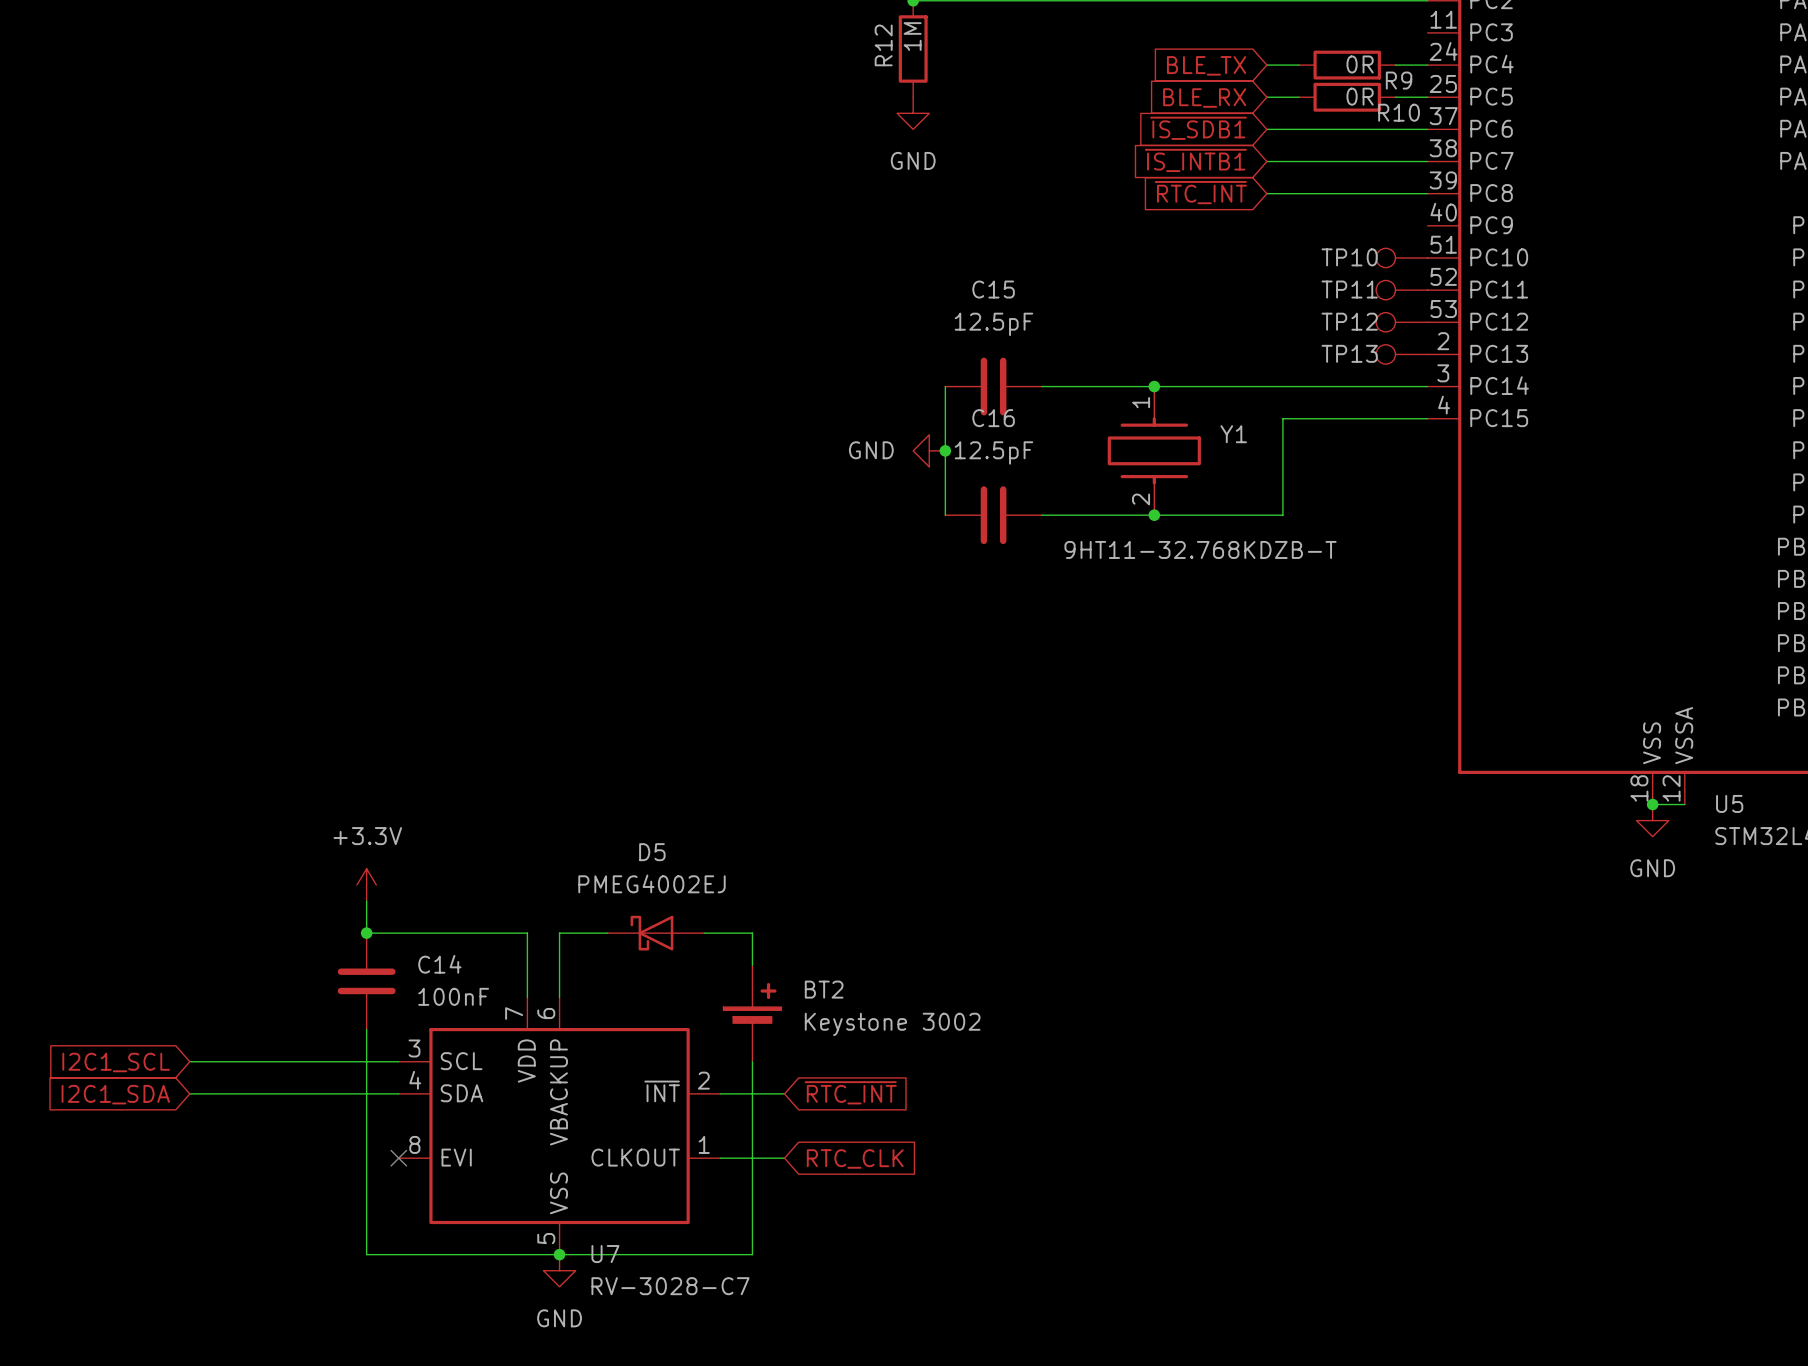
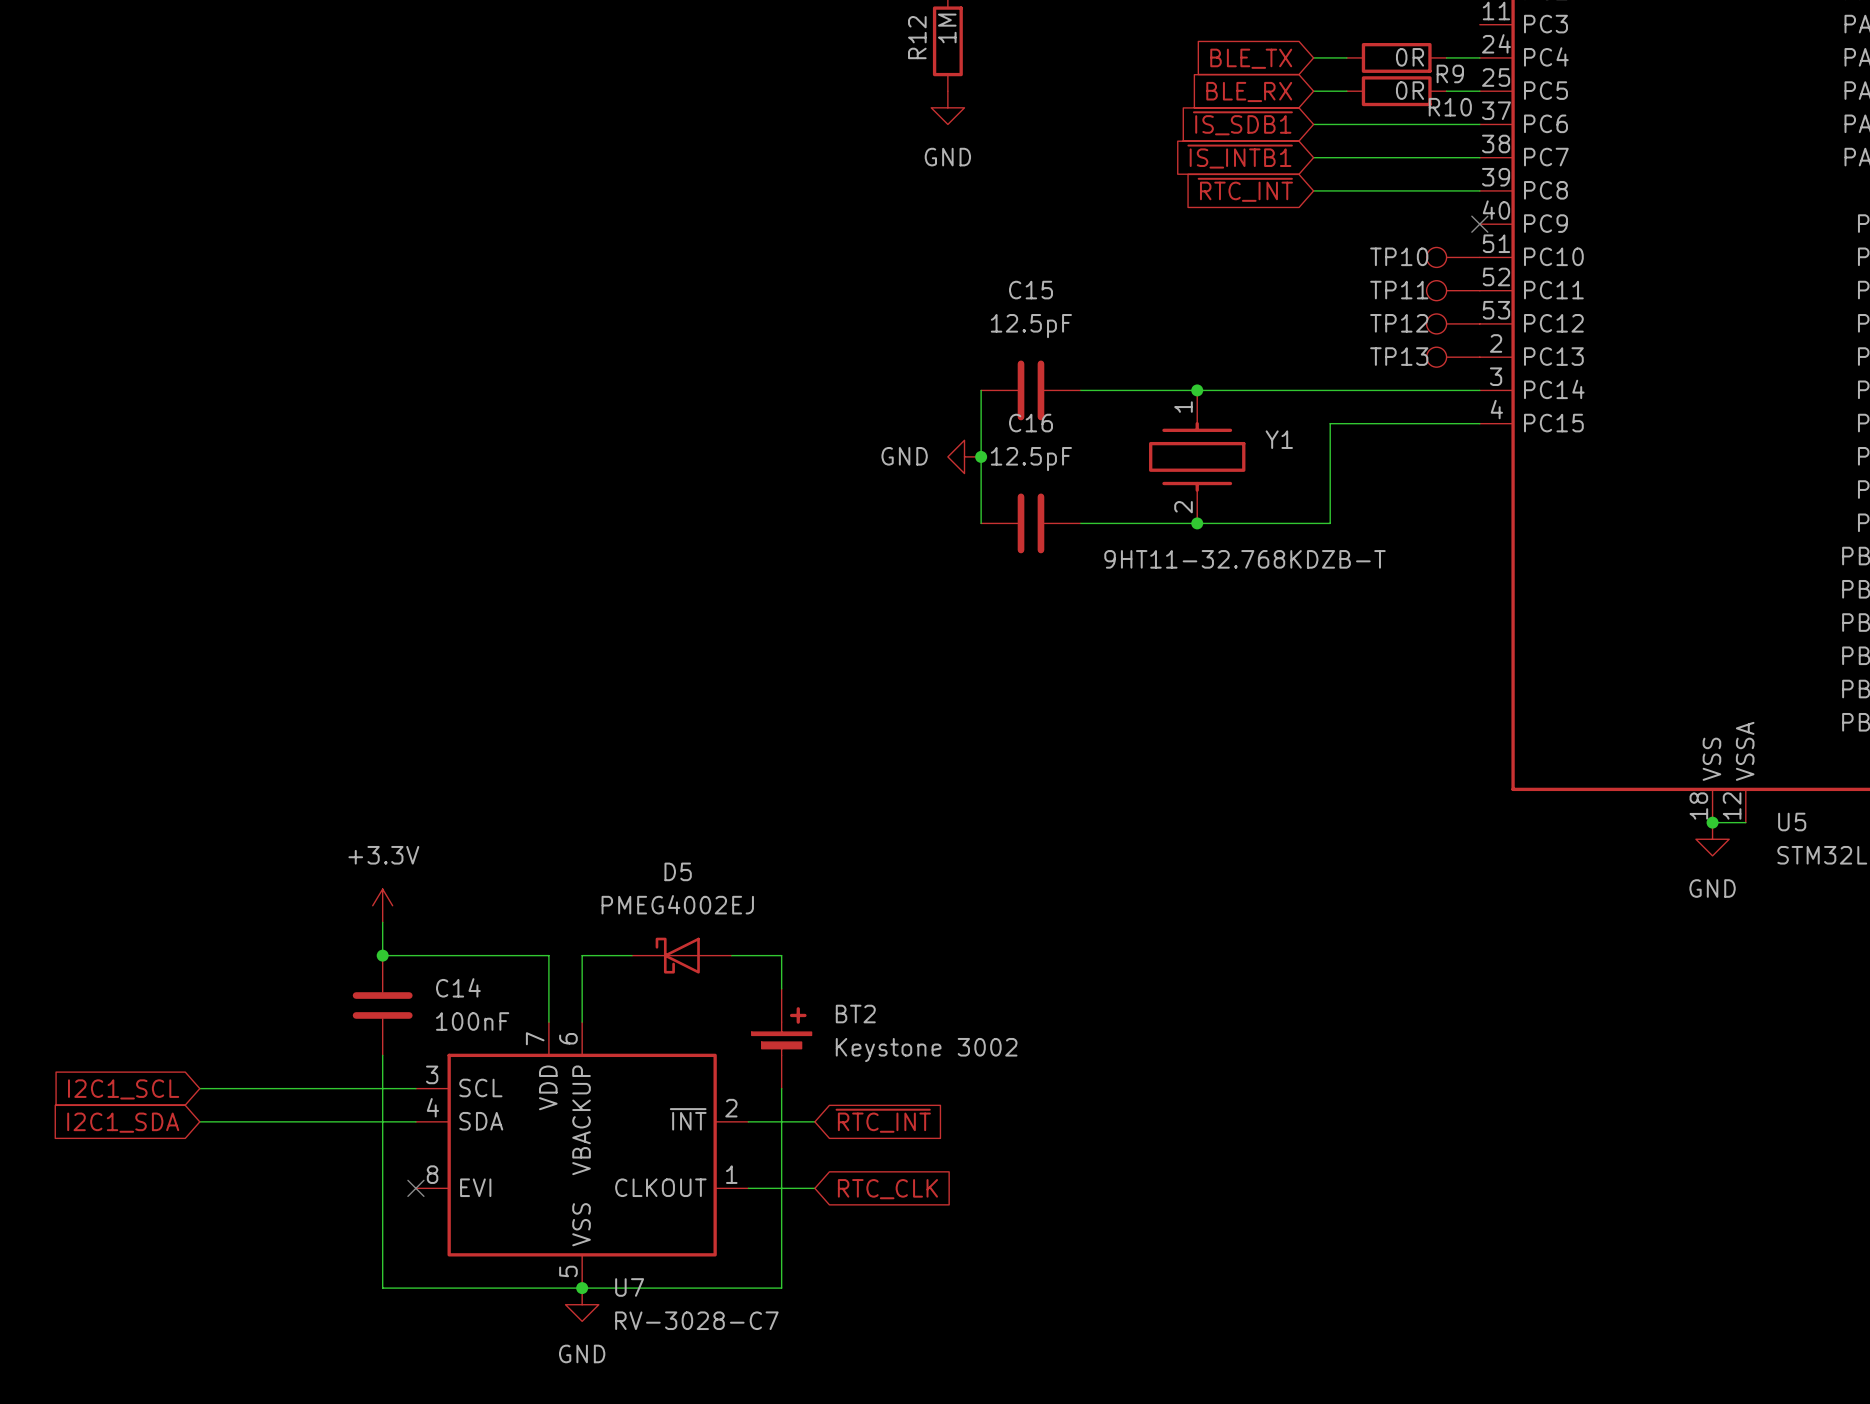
no-connect mark: none -> (1479, 224)

